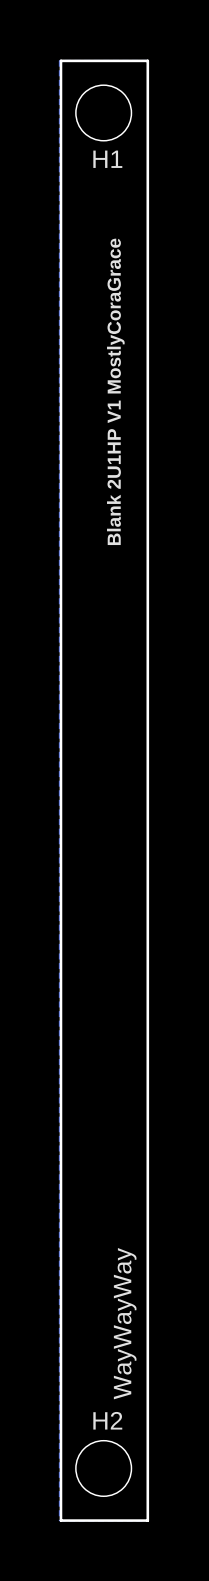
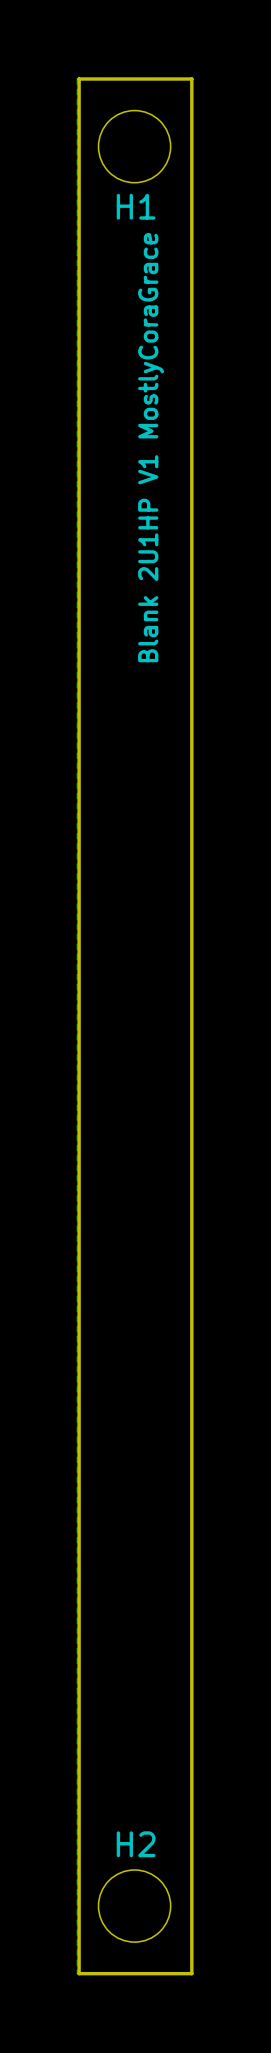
text position: Blank 2U1HP V1 MostlyCoraGrace (115, 391) -> Blank 2U1HP V1 MostlyCoraGrace (151, 447)
text: WayWayWay (125, 1323) -> none

